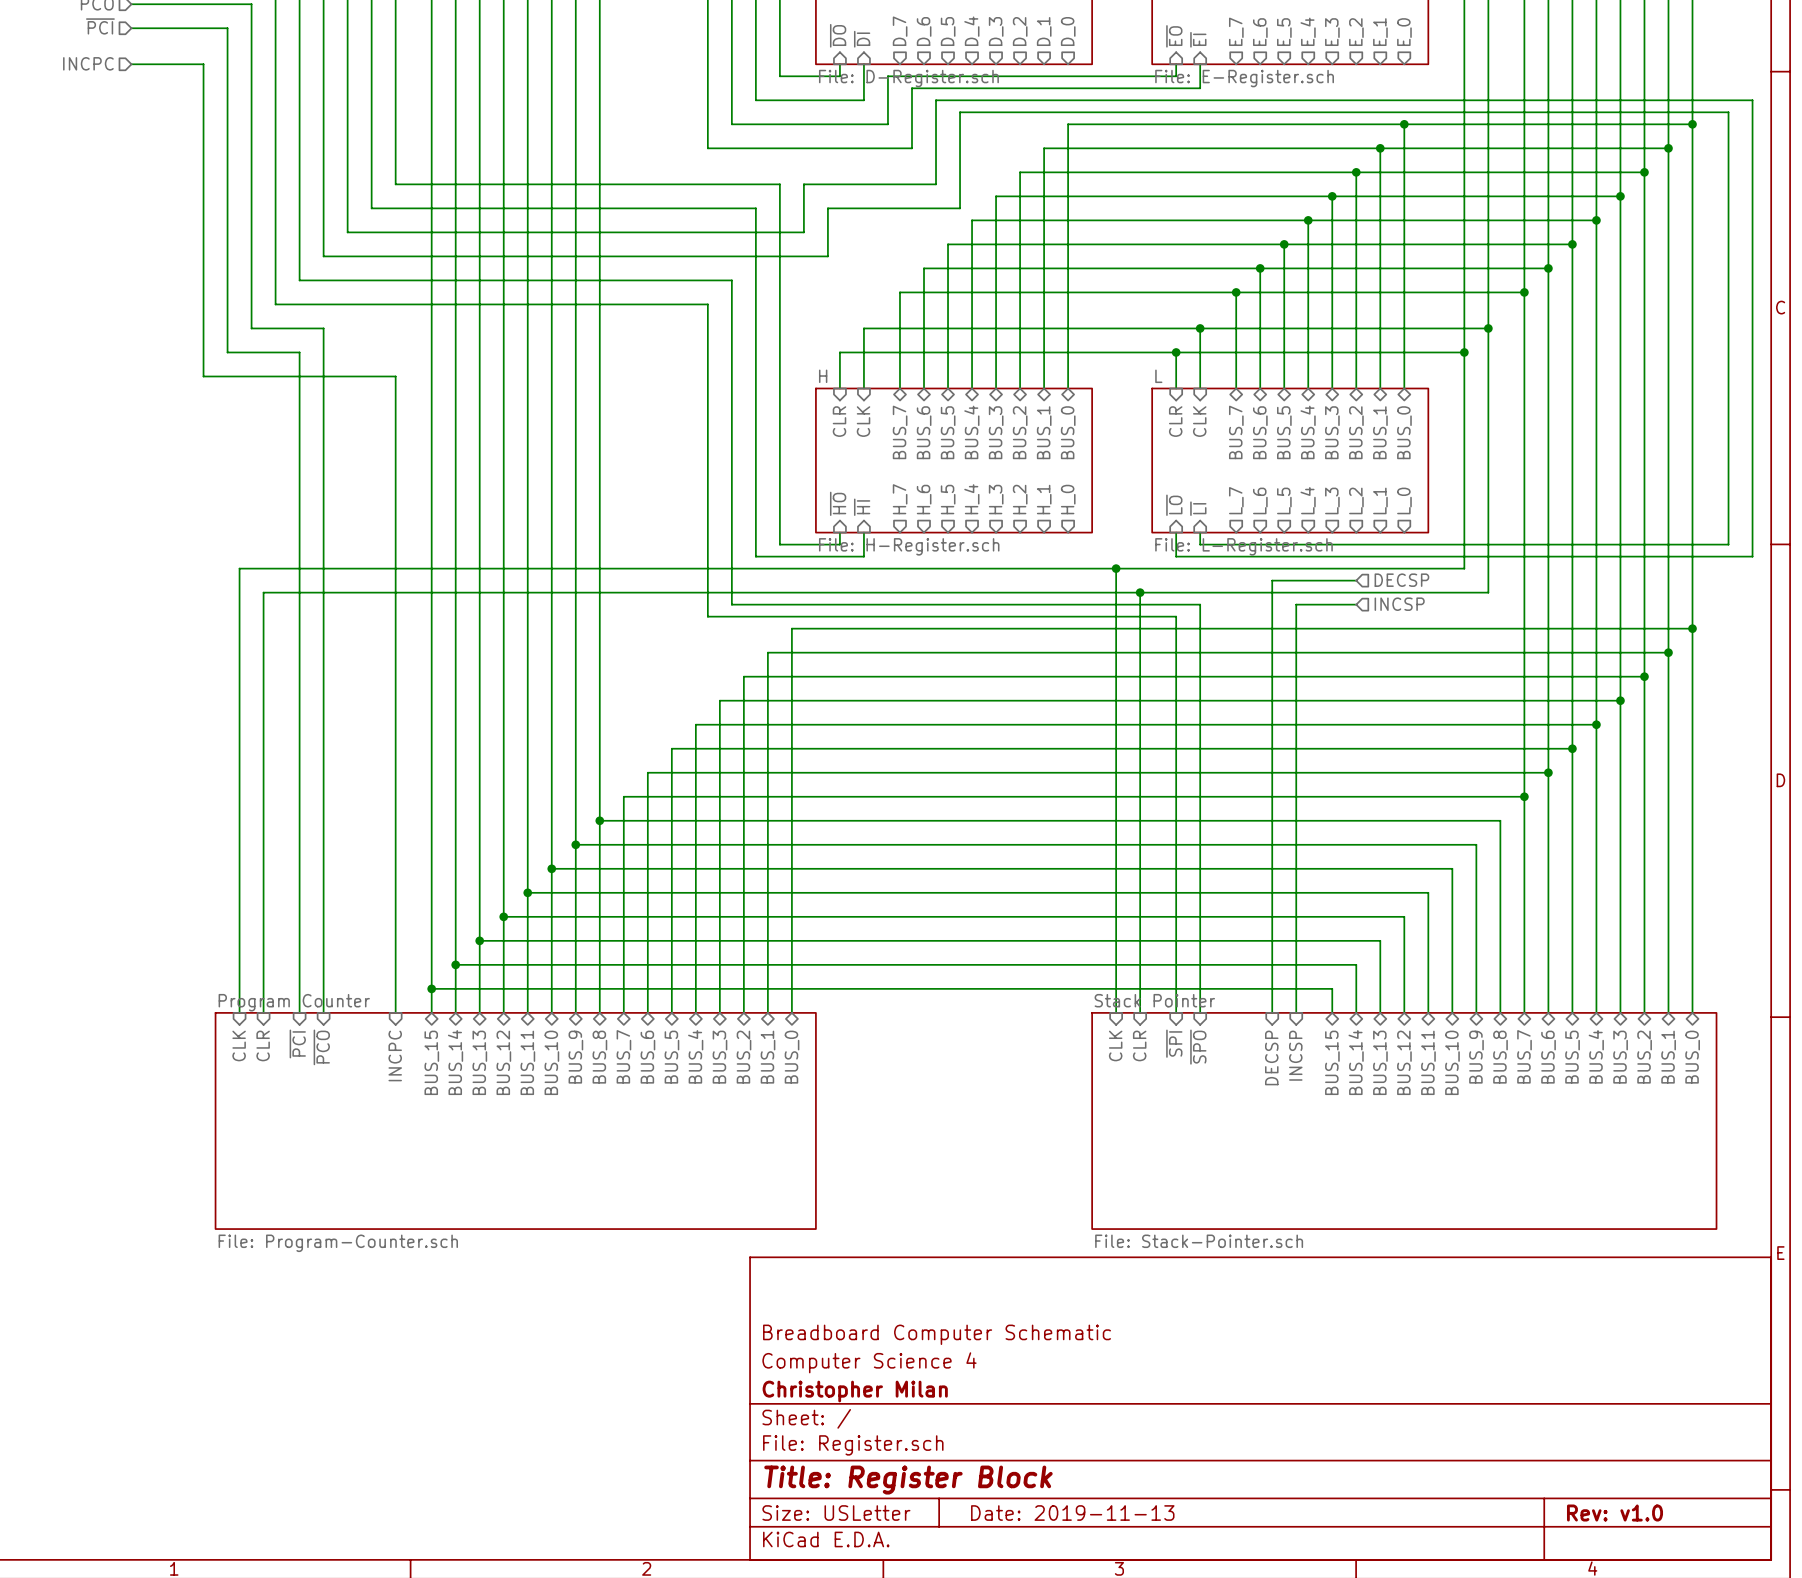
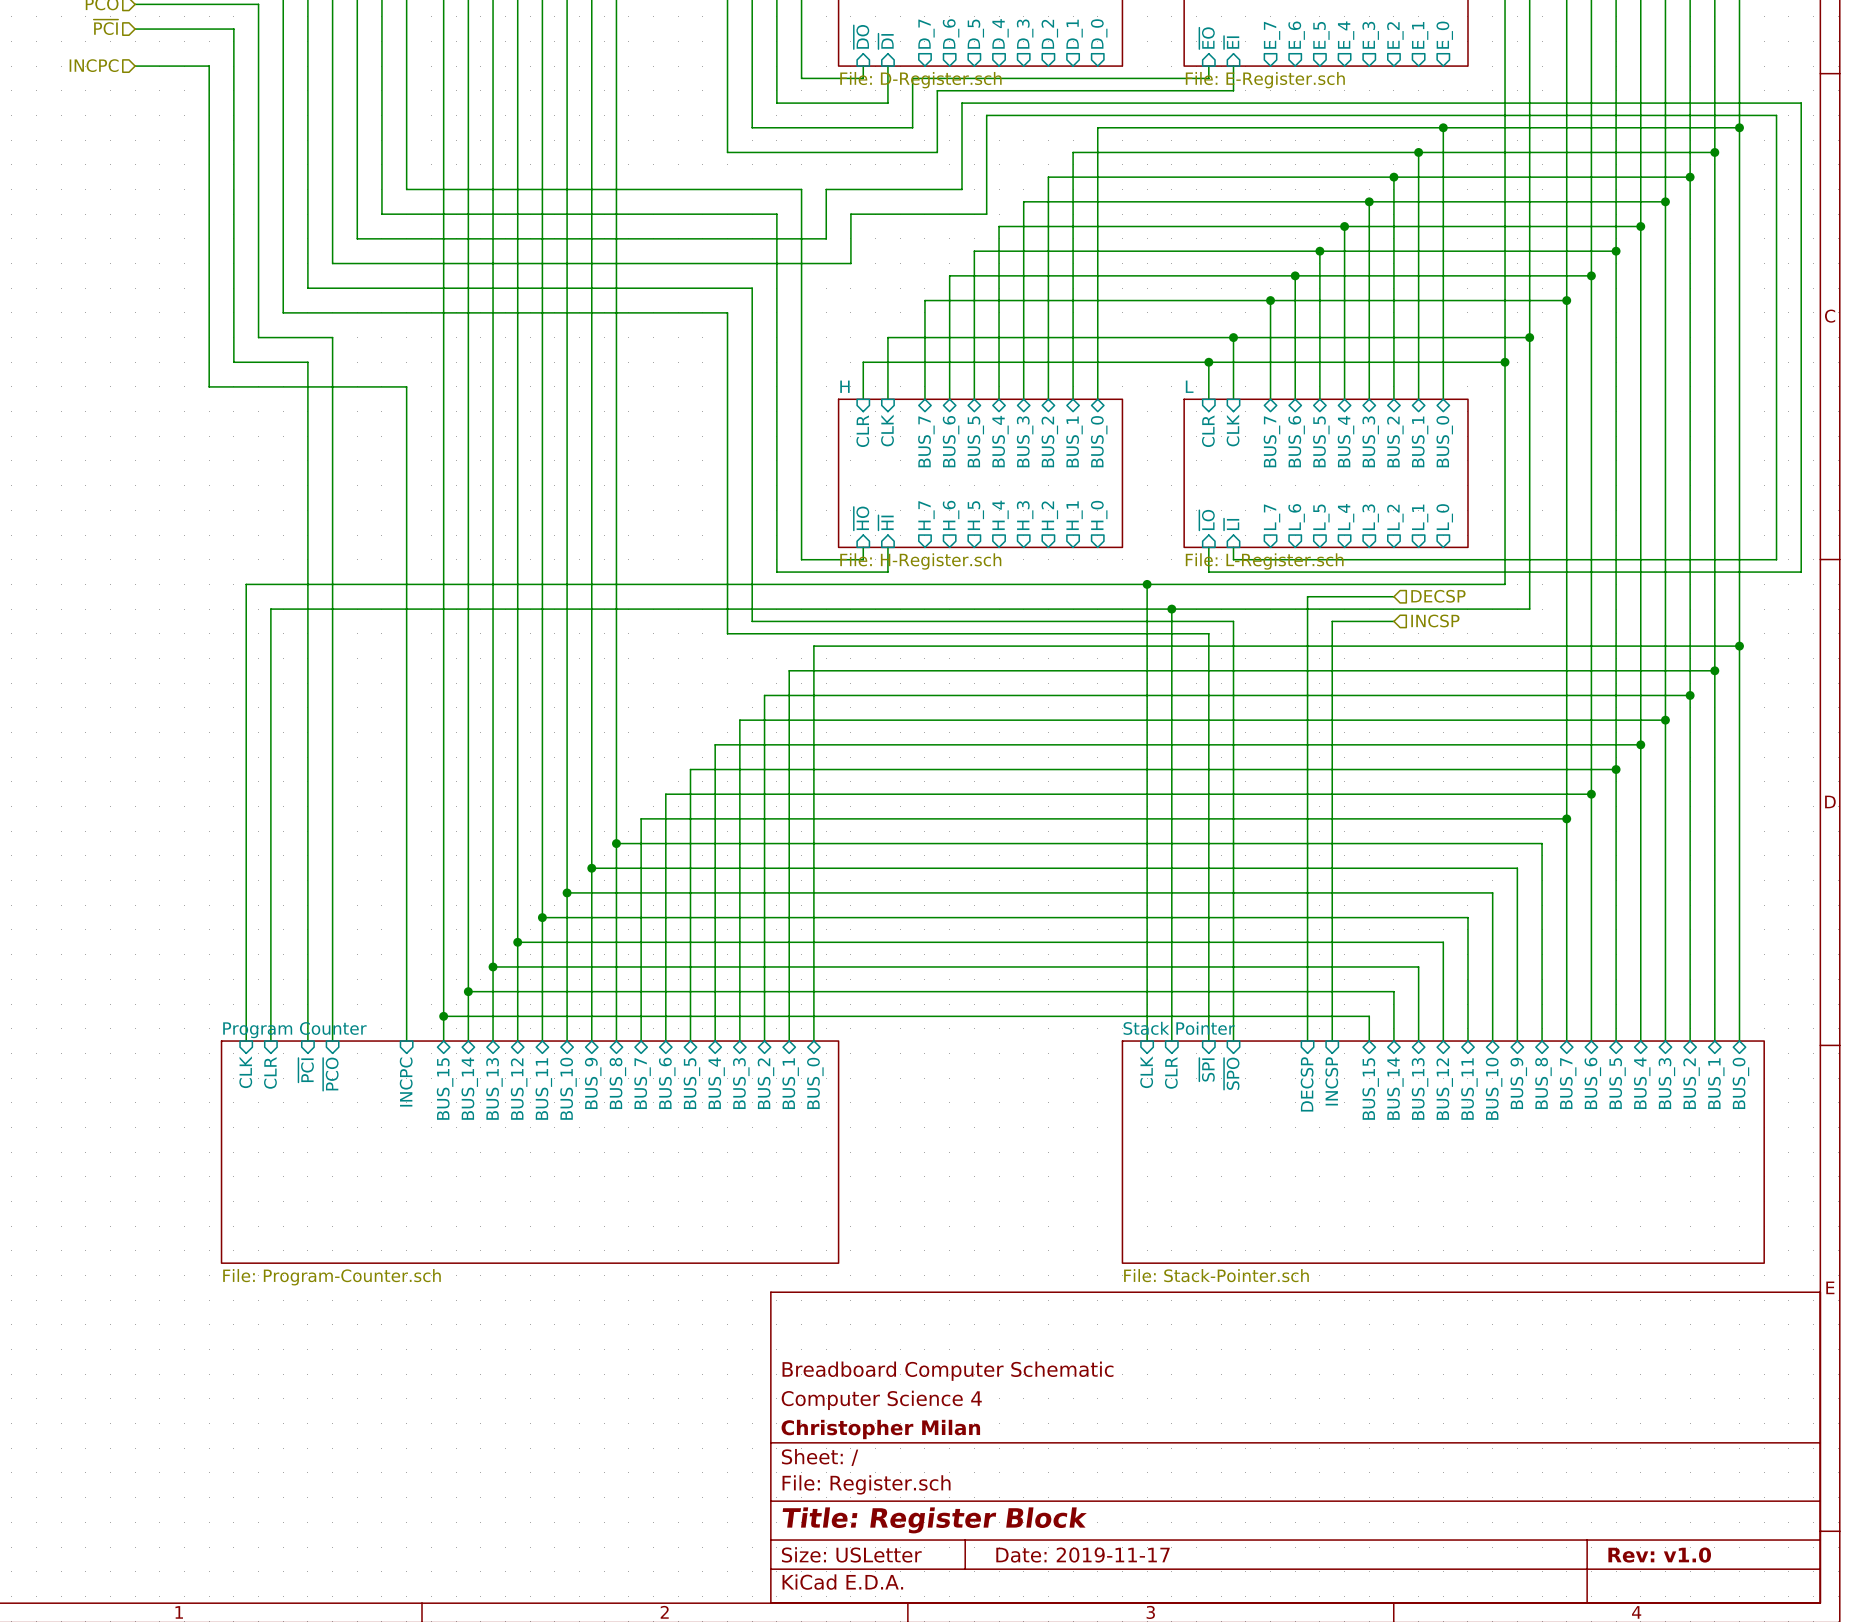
title block: Date: 2019-11-13 (1072, 1513) -> Date: 2019-11-17 (1083, 1555)

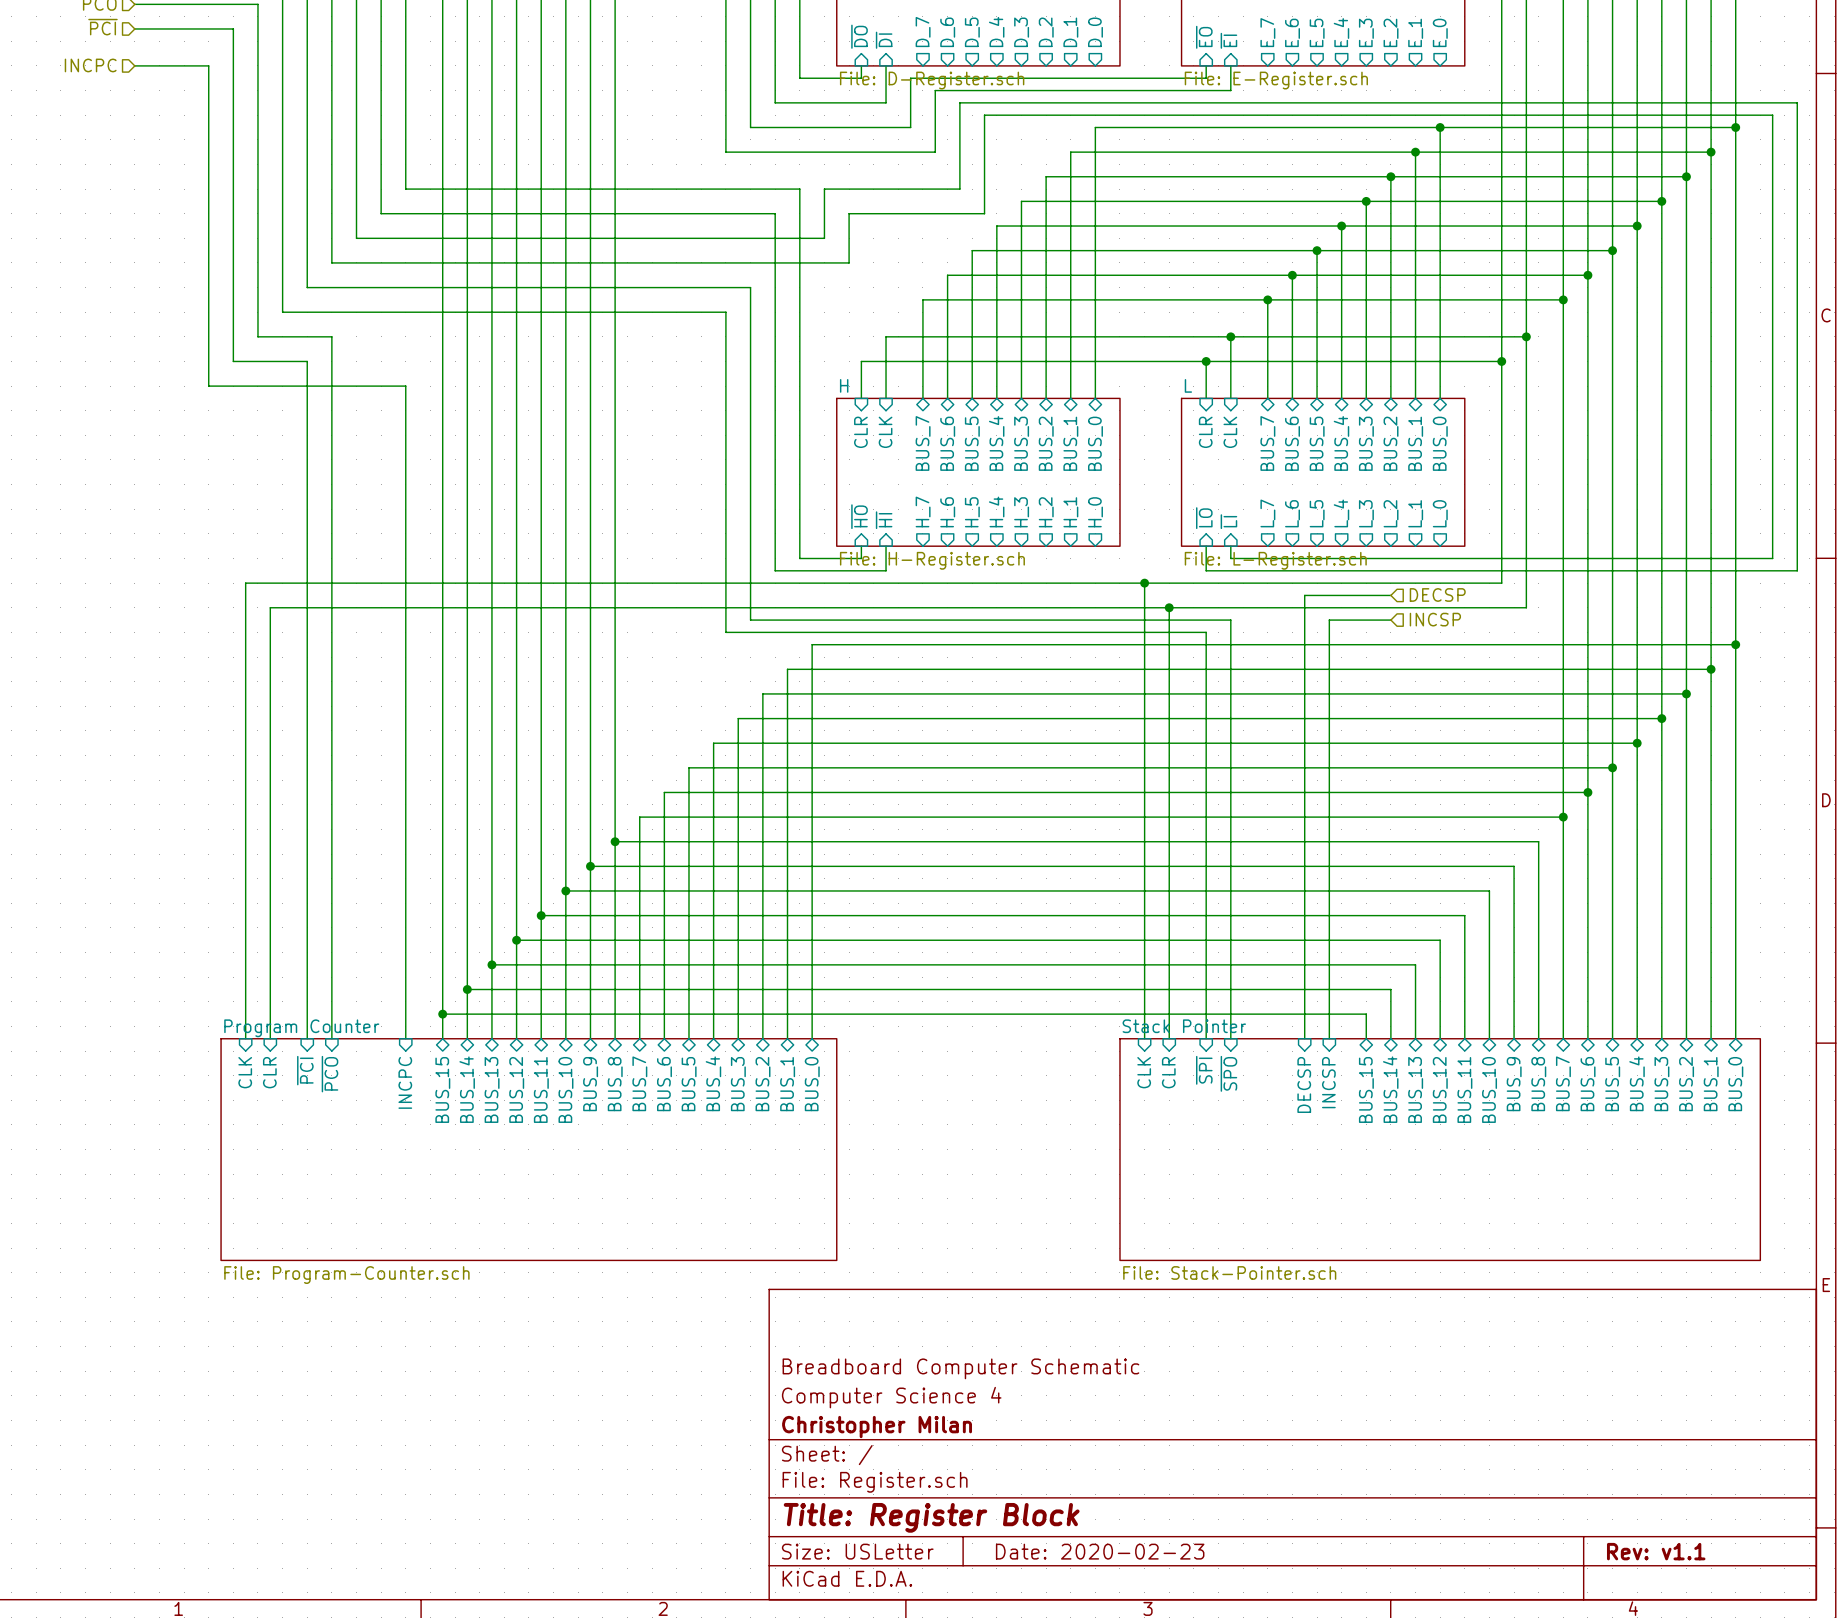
title block: Date: 2019-11-17 (1083, 1555) -> Date: 2020-02-23 (1100, 1551)
title block: Rev: v1.0 (1659, 1555) -> Rev: v1.1 (1656, 1551)

